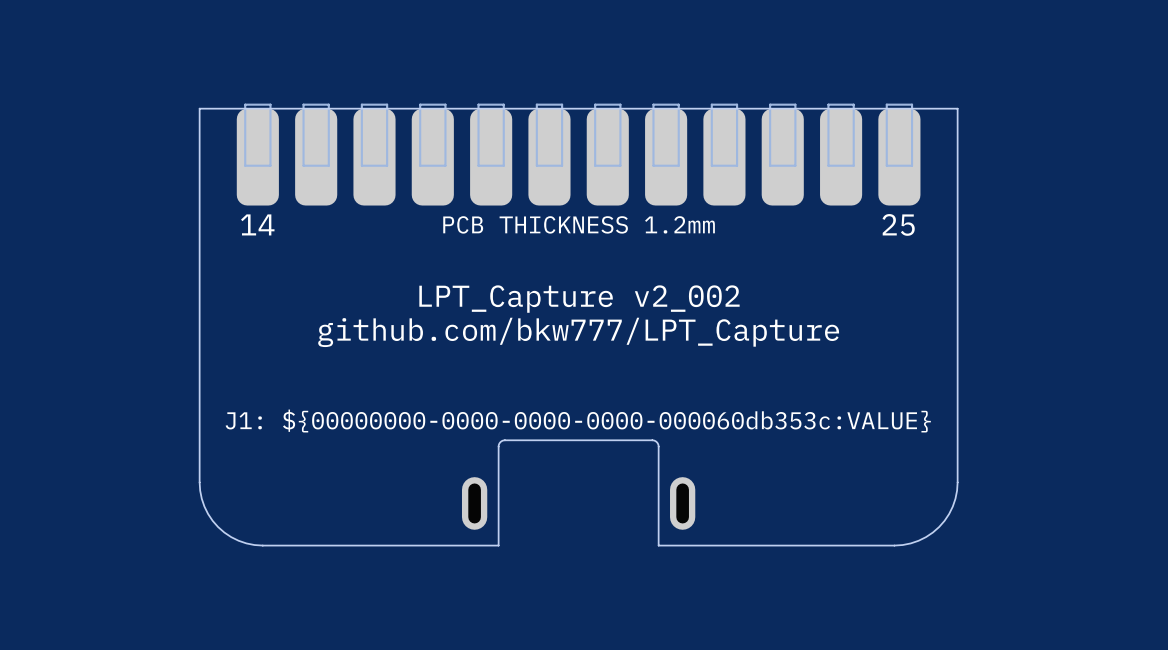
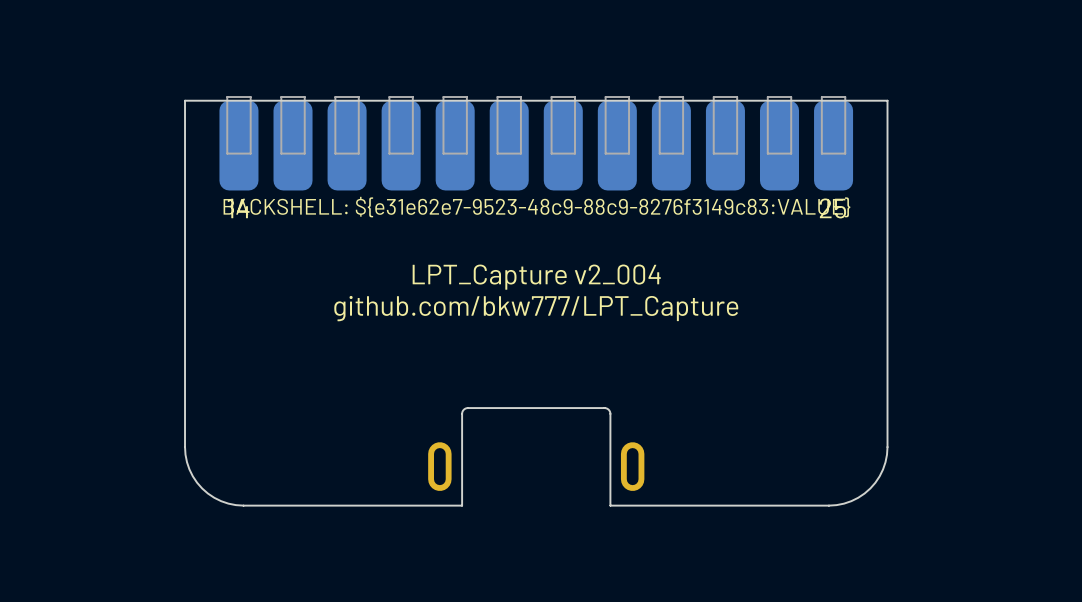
text: PCB THICKNESS 1.2mm (579, 224) -> BACKSHELL: ${e31e62e7-9523-48c9-88c9-8276f3149c83:VALUE} (536, 207)
text: LPT_Capture v2_002 (579, 299) -> LPT_Capture v2_004 (536, 277)
text: J1: ${00000000-0000-0000-0000-000060db353c:VALUE} (578, 421) -> none

